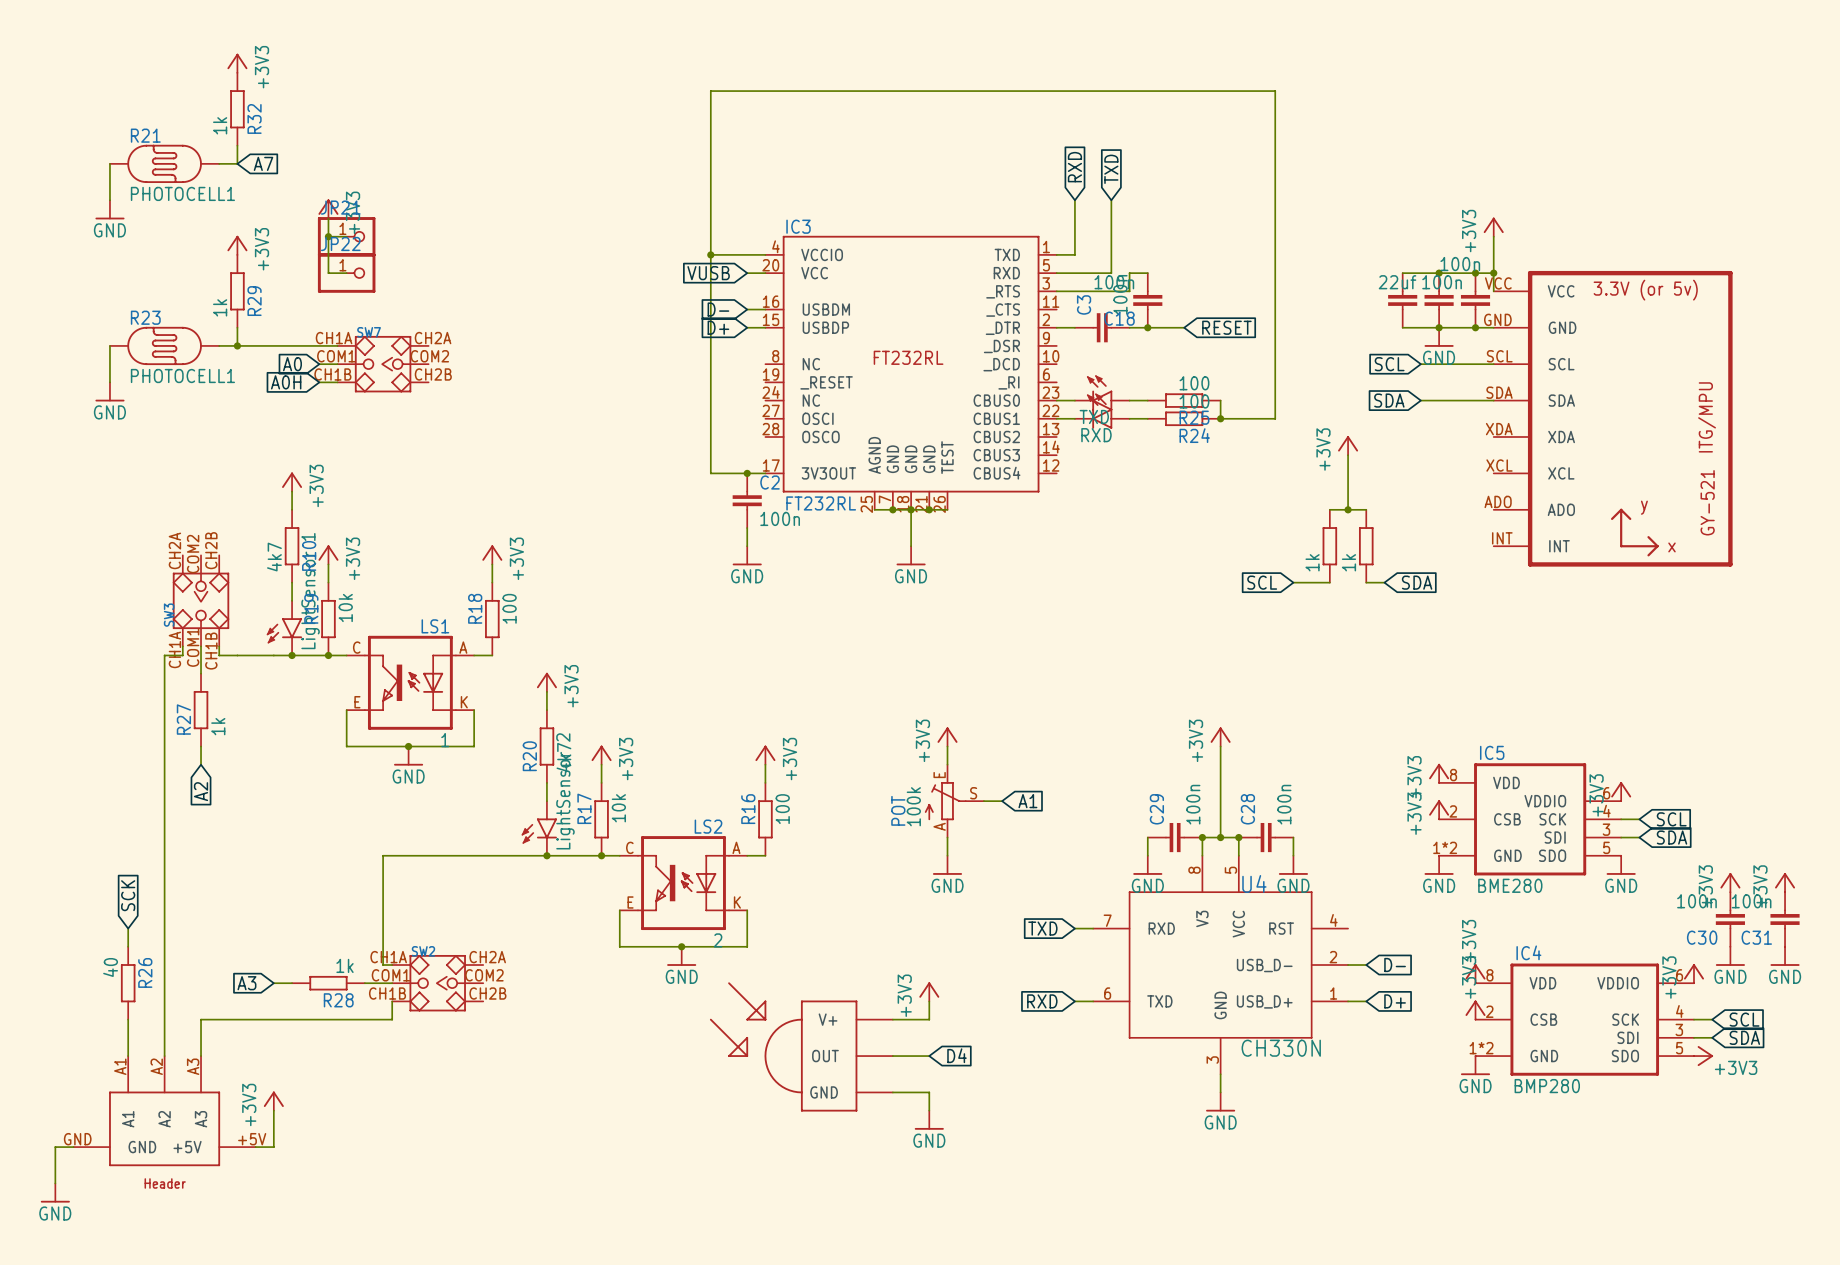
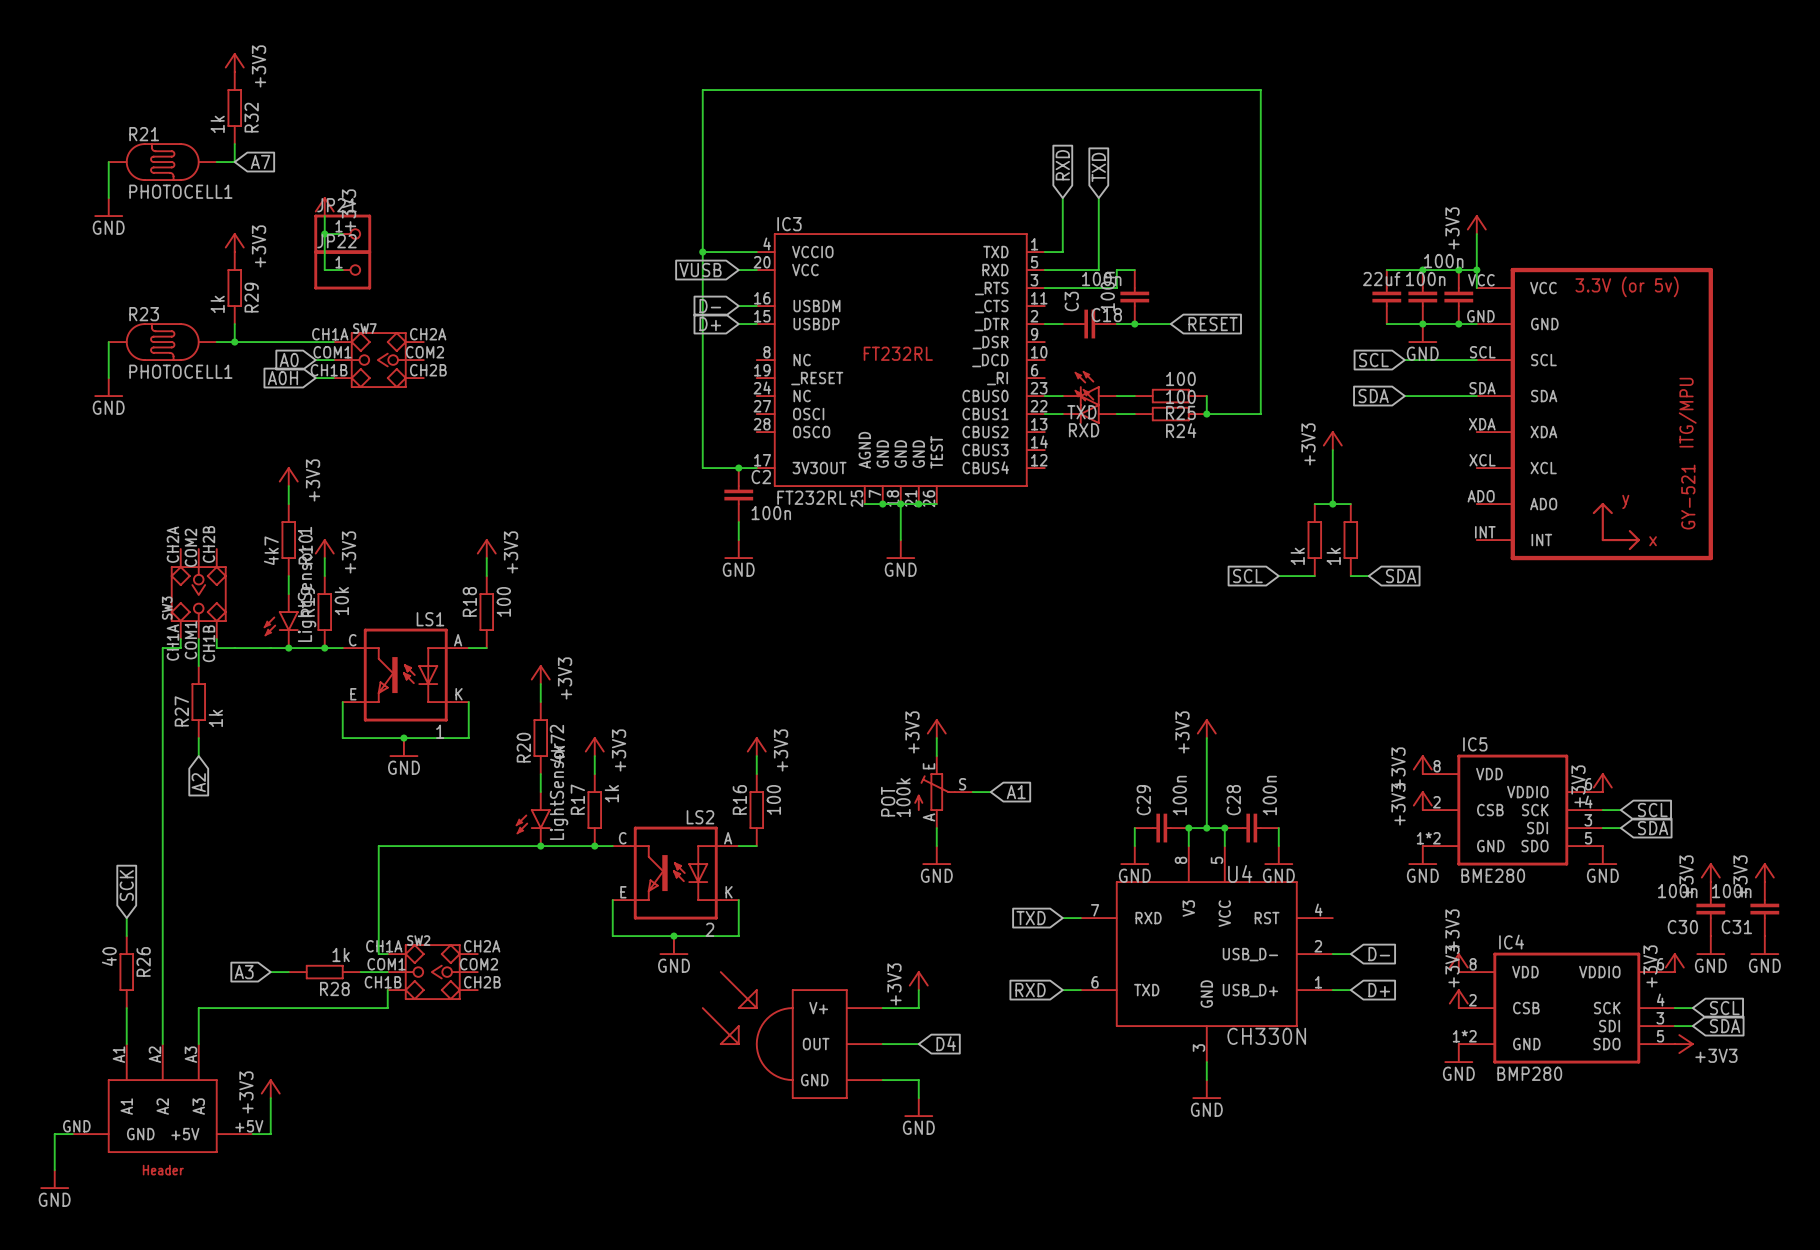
R17 value: 10k (618, 808) -> 1k (611, 793)

